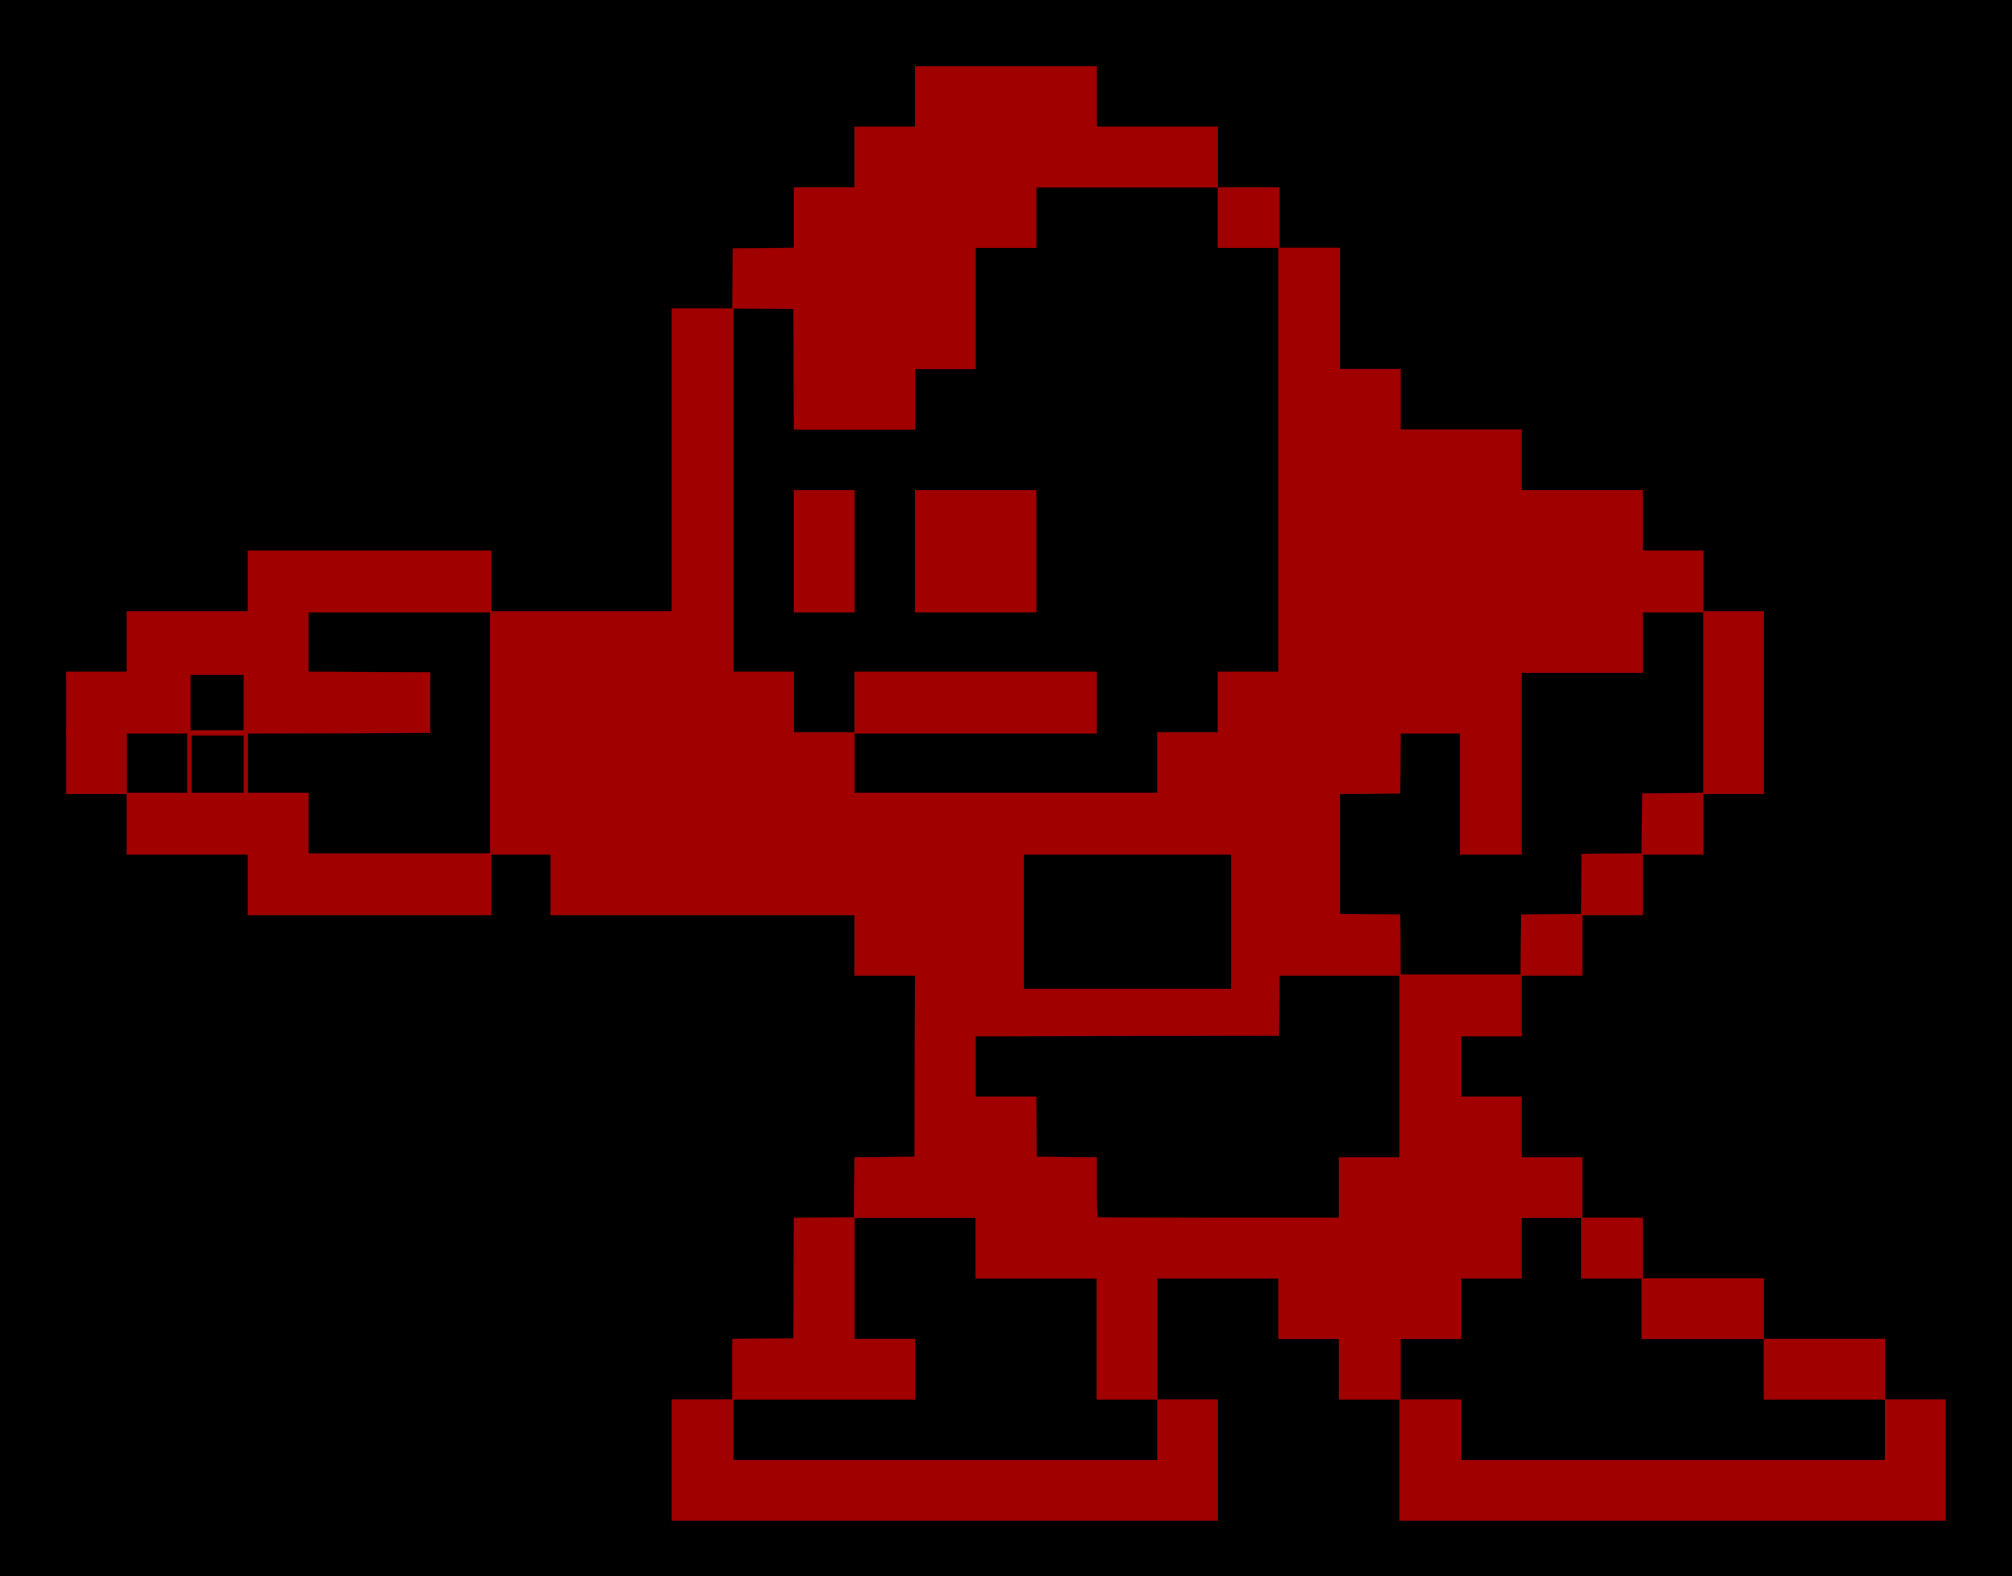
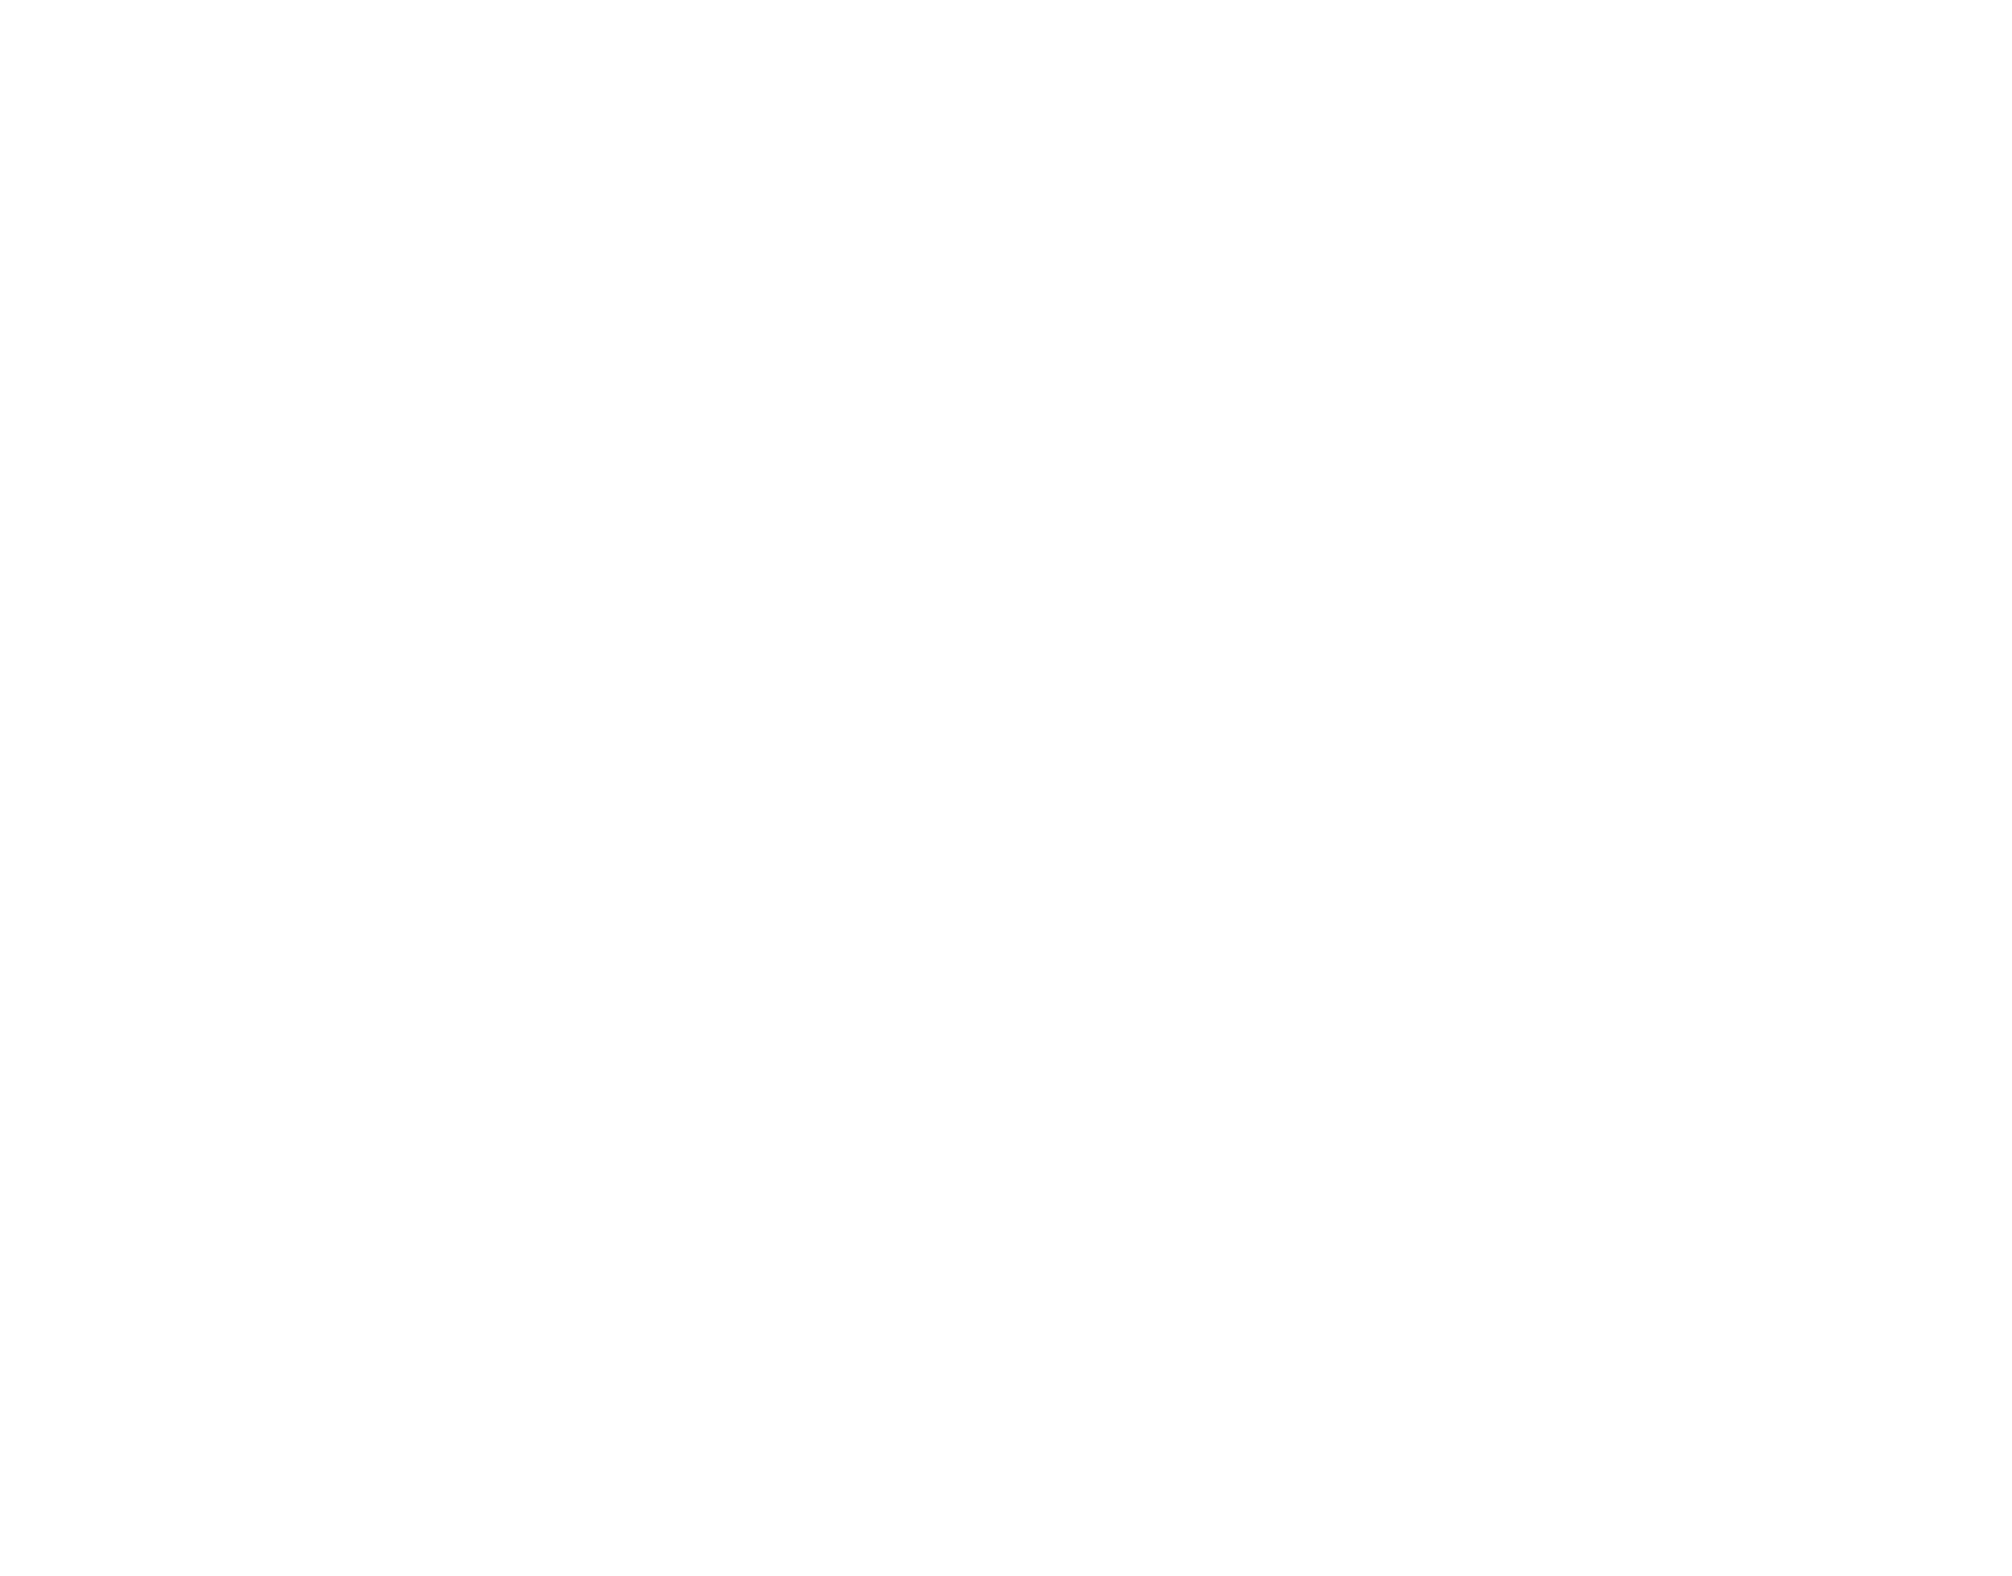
drawing: [66, 66, 1946, 1521] -> none

